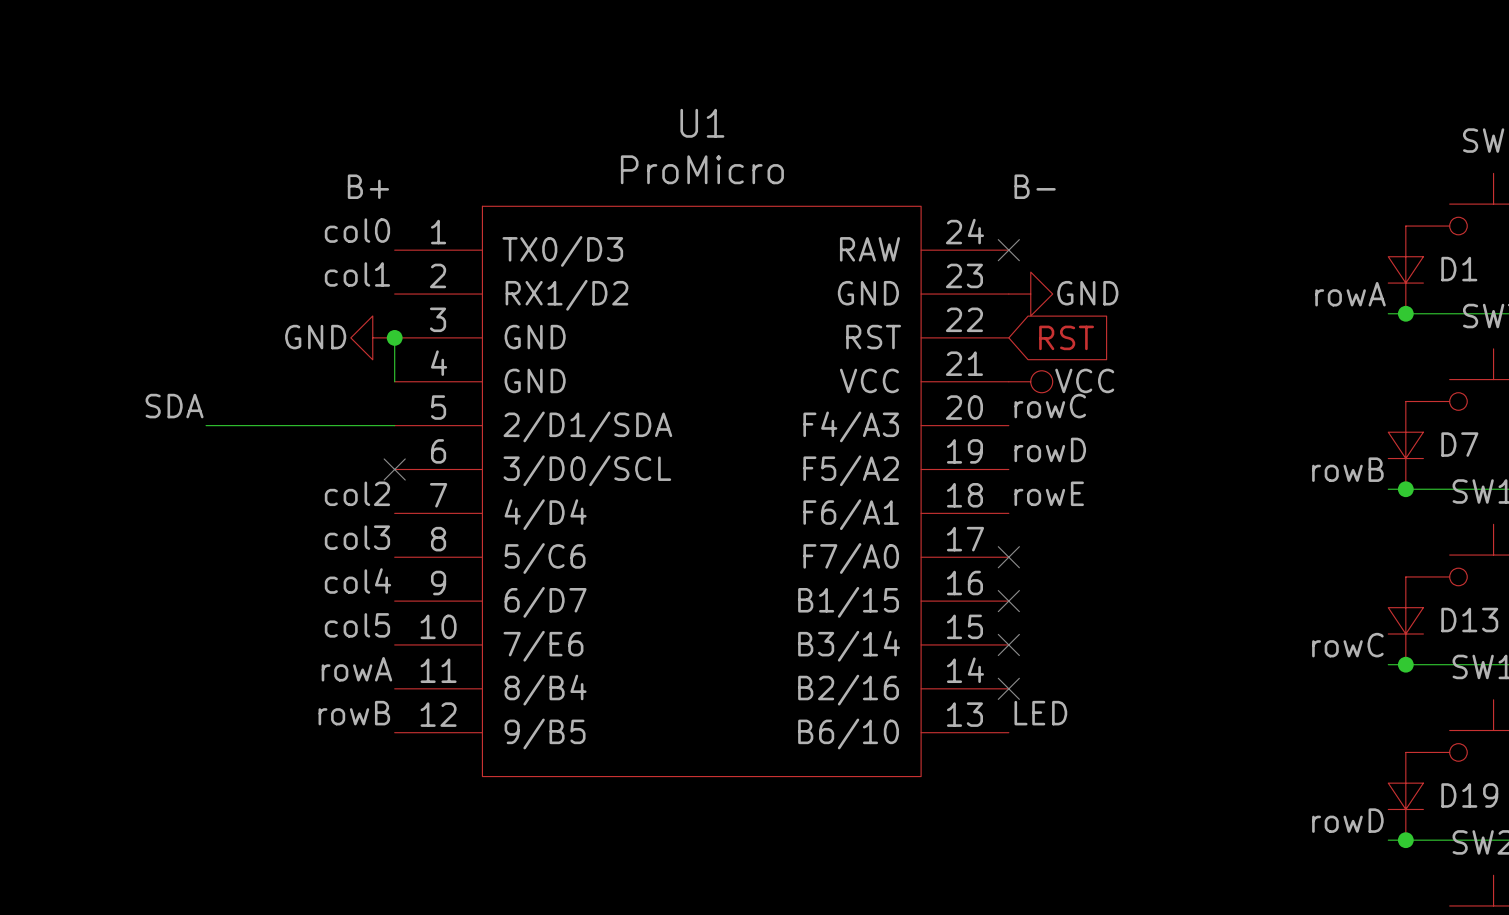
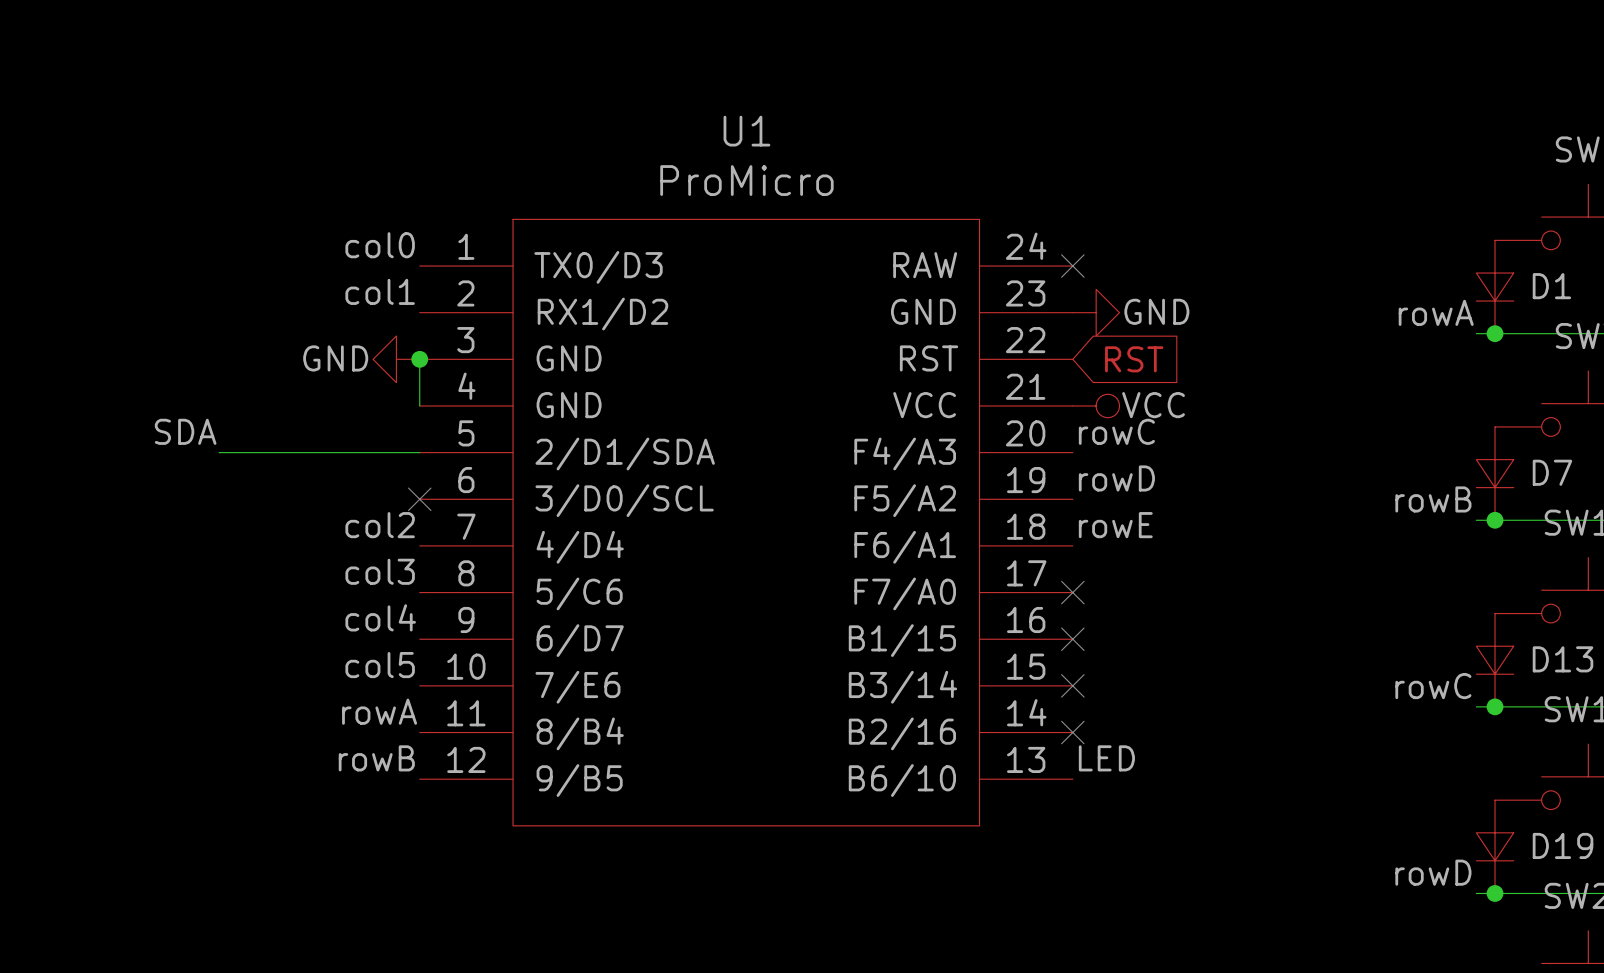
label: B+ (368, 186) -> none
label: B- (1035, 186) -> none

